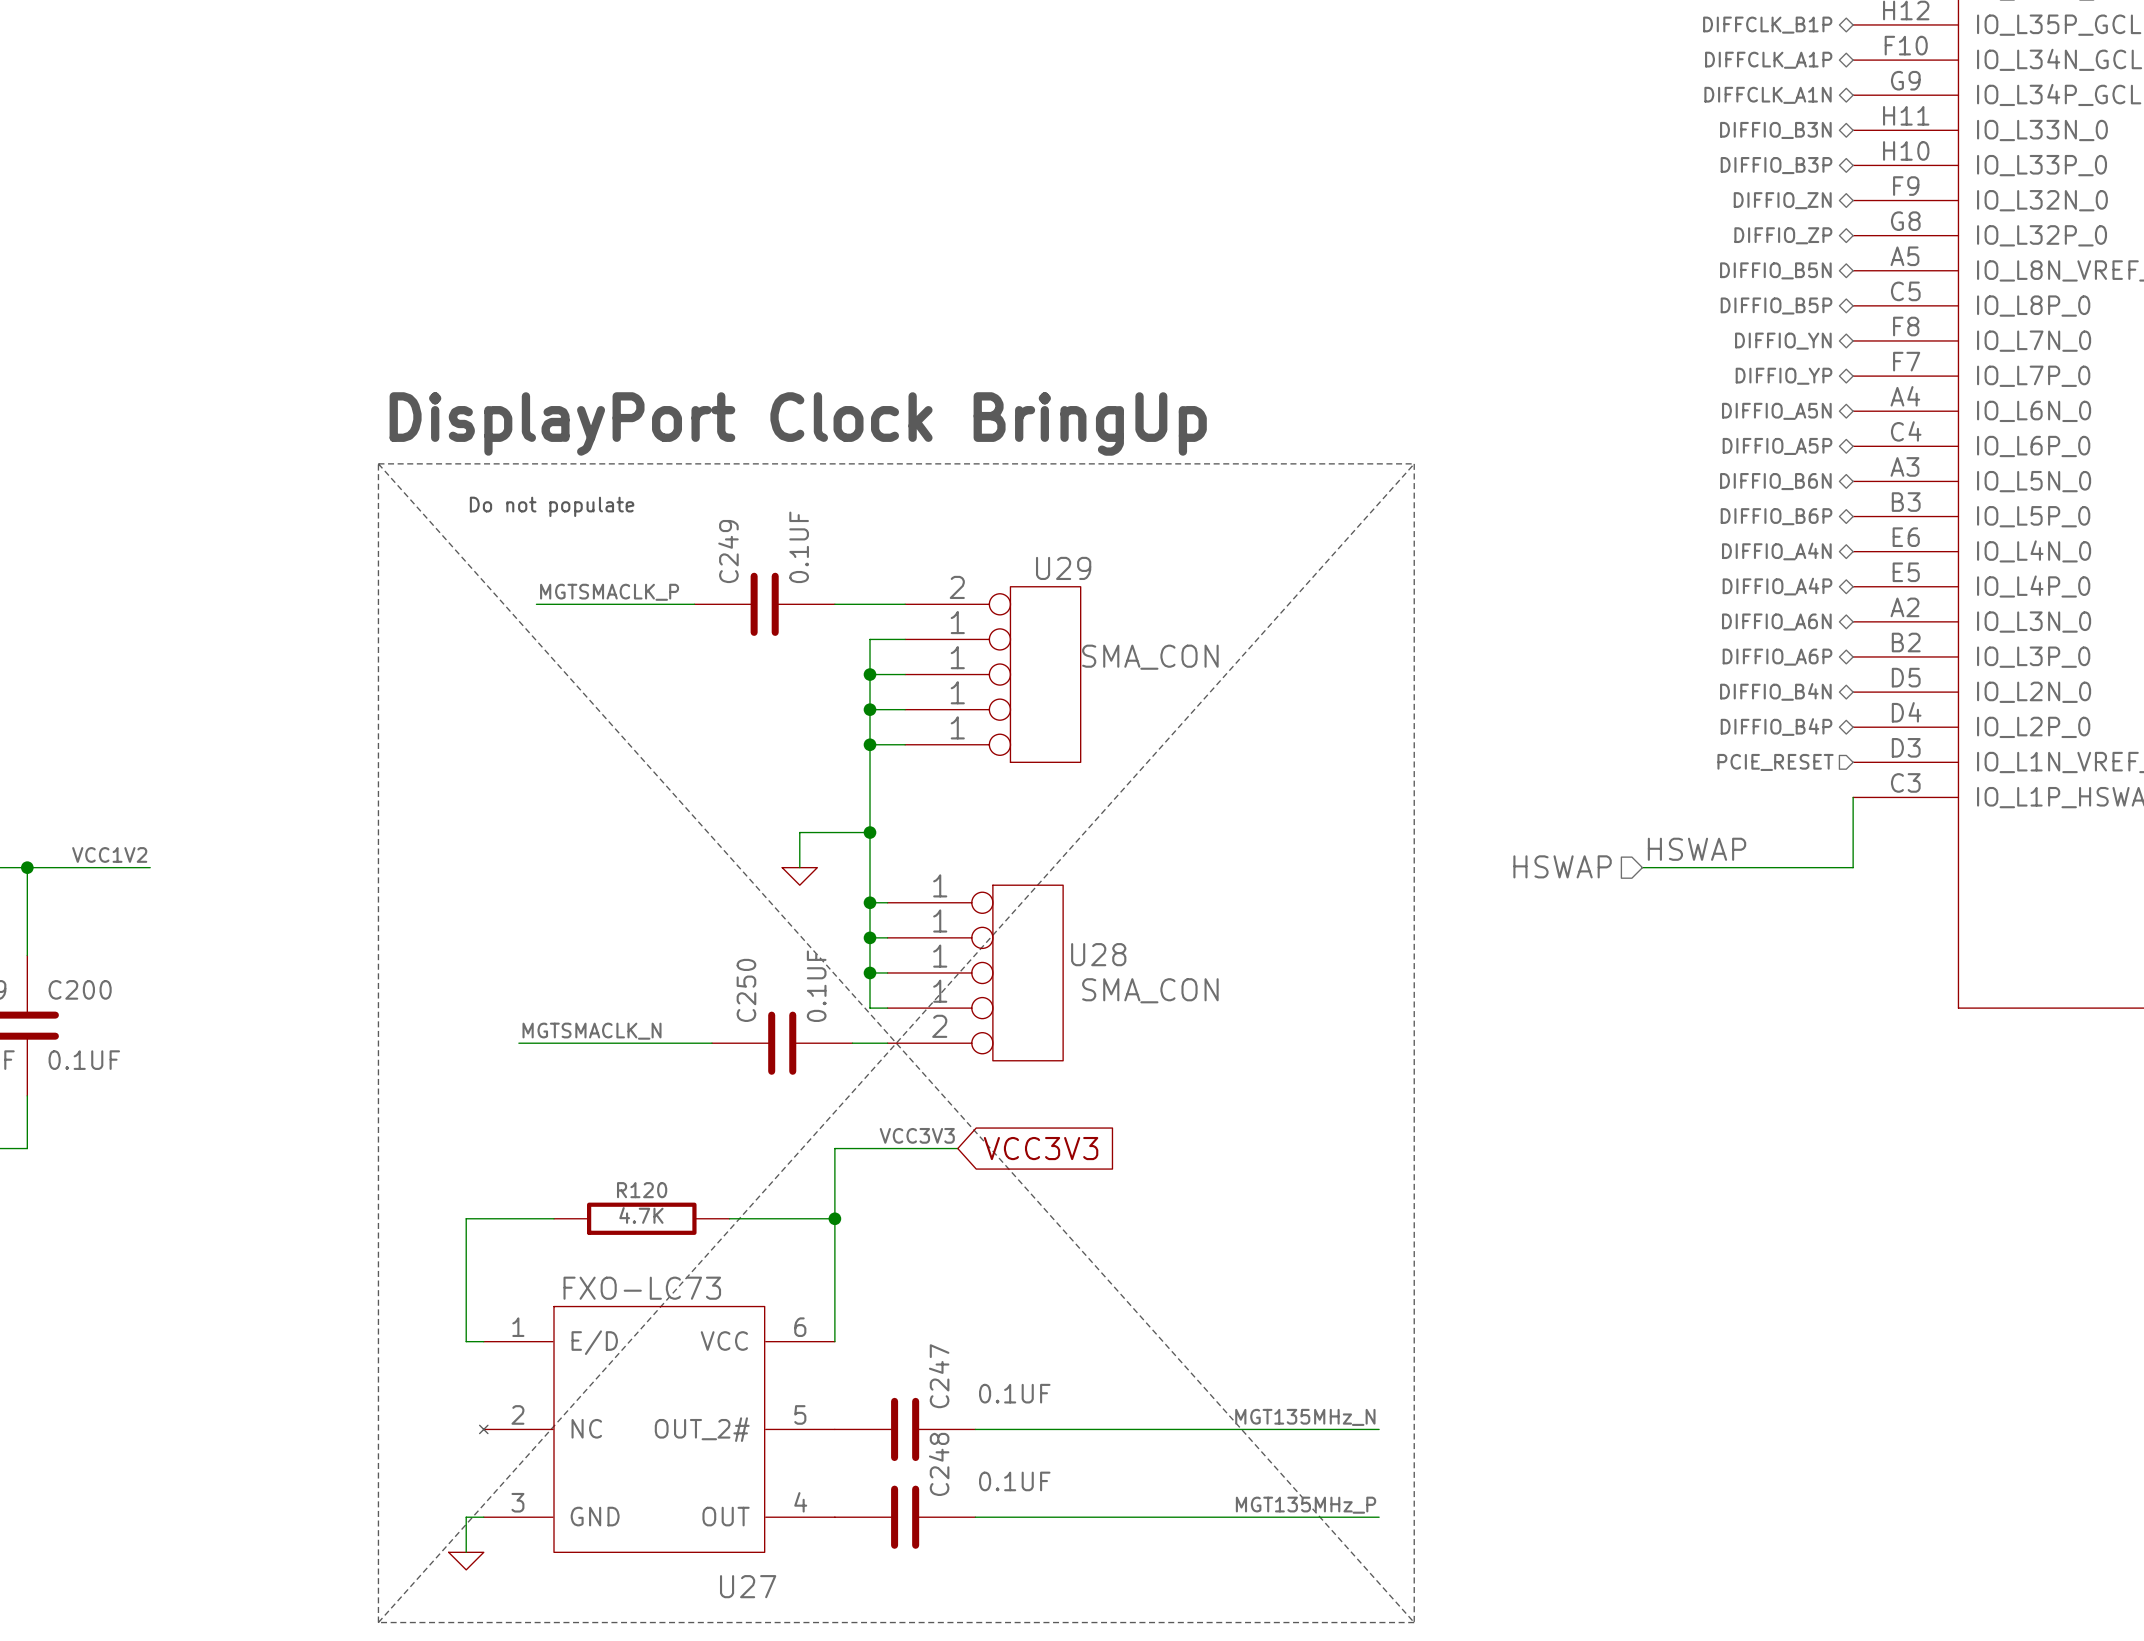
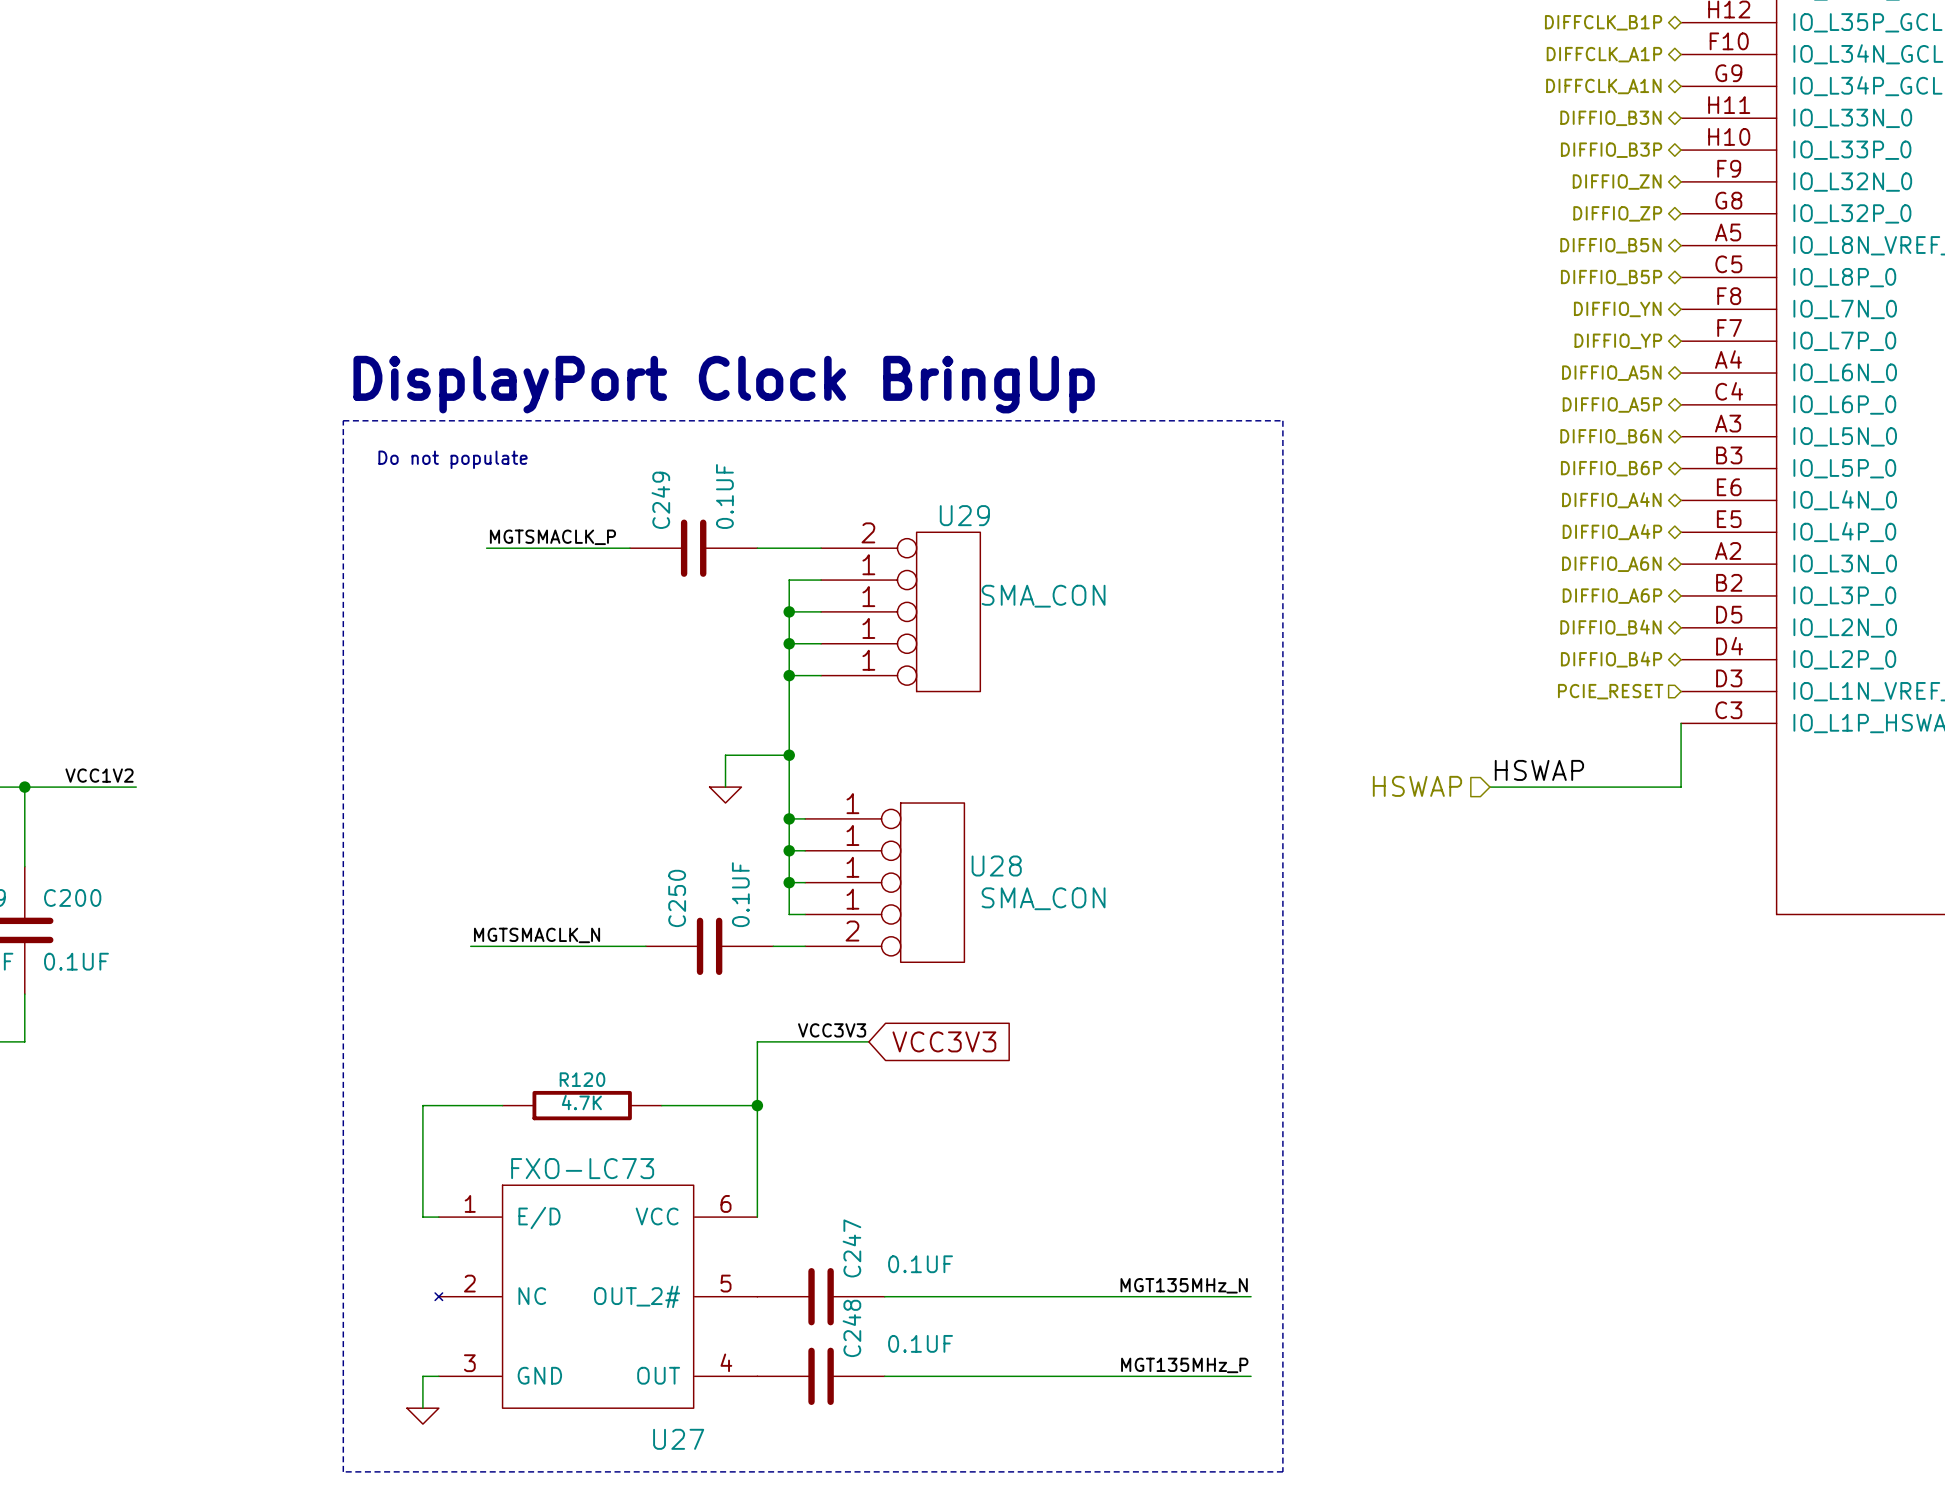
line: (378, 463) (1414, 1622) -> none
line: (1414, 463) (378, 1622) -> none
text position: Do not populate (552, 506) -> Do not populate (453, 459)

